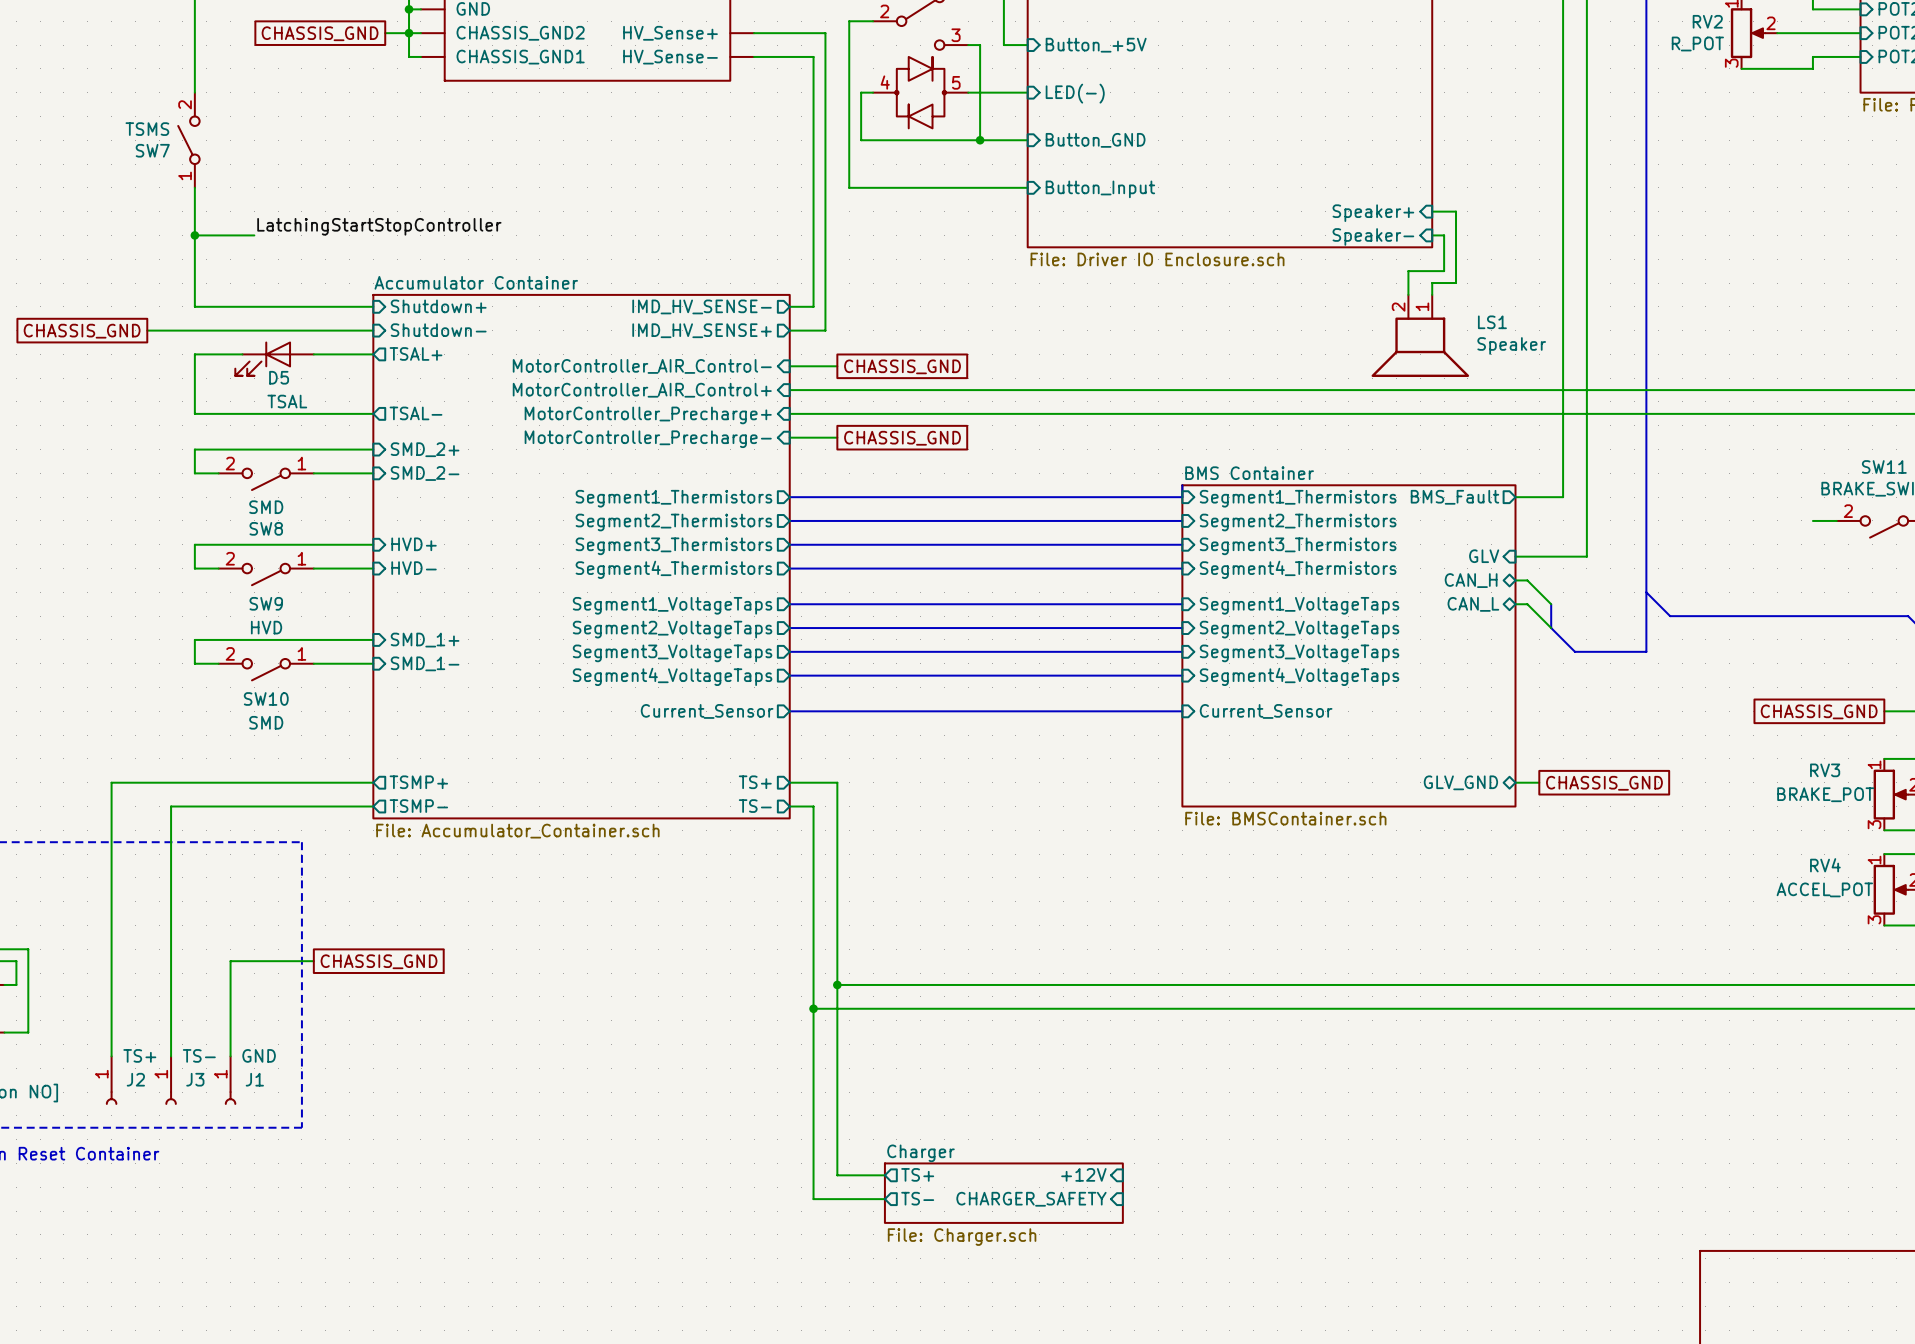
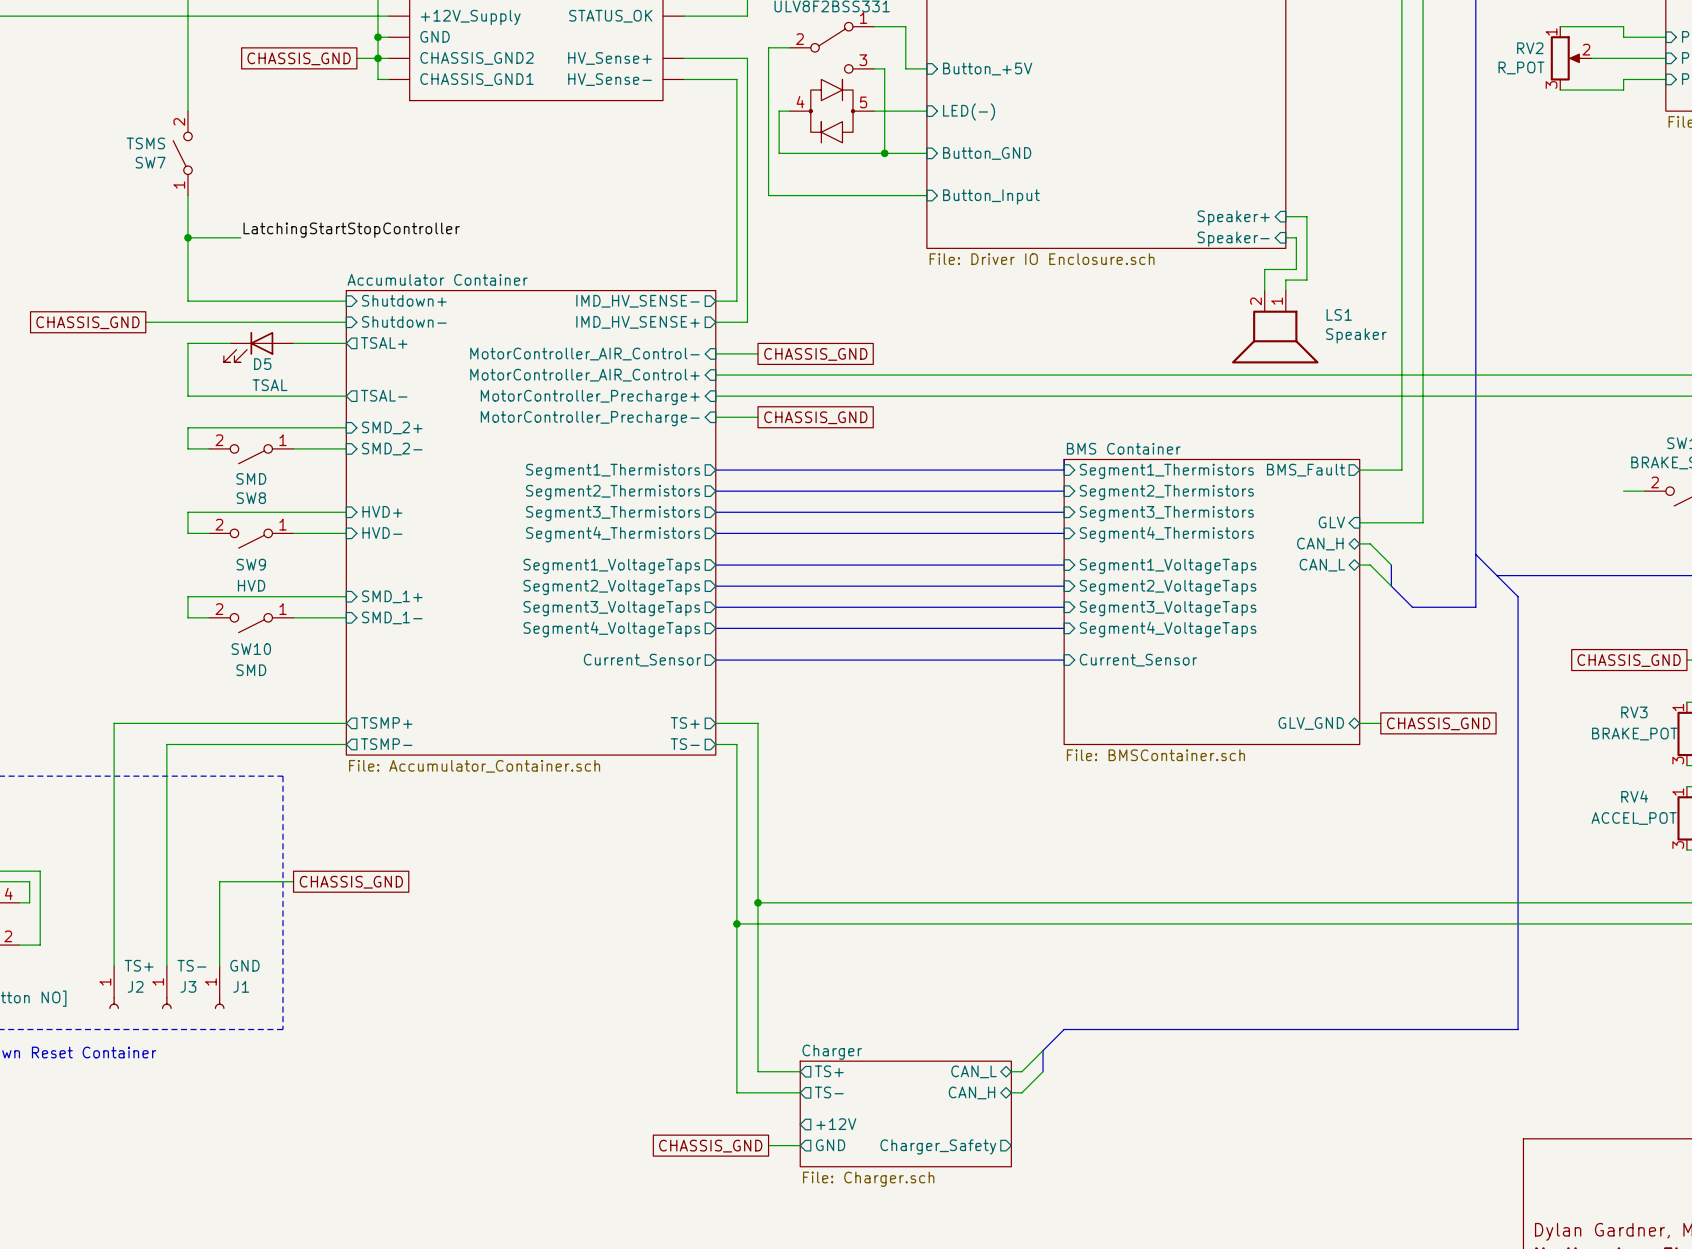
bus: none -> (1496, 575) (1518, 596) (1518, 1029) (1064, 1029) (1043, 1050) (1043, 1071)
wire: none -> (1043, 1050) (1021, 1071) (1011, 1071)
sheet pin shape: input (1083, 1174) -> bidirectional (973, 1071)
sheet pin: +12V (1083, 1174) -> CAN_L (973, 1071)
wire: none -> (1043, 1071) (1021, 1092) (1011, 1092)
sheet Charger: File: Charger.sch (1003, 1193) -> none
sheet pin shape: input (1031, 1199) -> bidirectional (971, 1092)
sheet pin: CHARGER_SAFETY (1031, 1199) -> CAN_H (971, 1092)
sheet Charger: none -> File: Charger.sch (905, 1113)
sheet pin: none -> +12V (836, 1124)
wire: none -> (768, 1145) (800, 1145)
sheet pin: none -> GND (830, 1145)
global label: none -> CHASSIS_GND (710, 1146)
sheet pin: none -> Charger_Safety (938, 1146)

